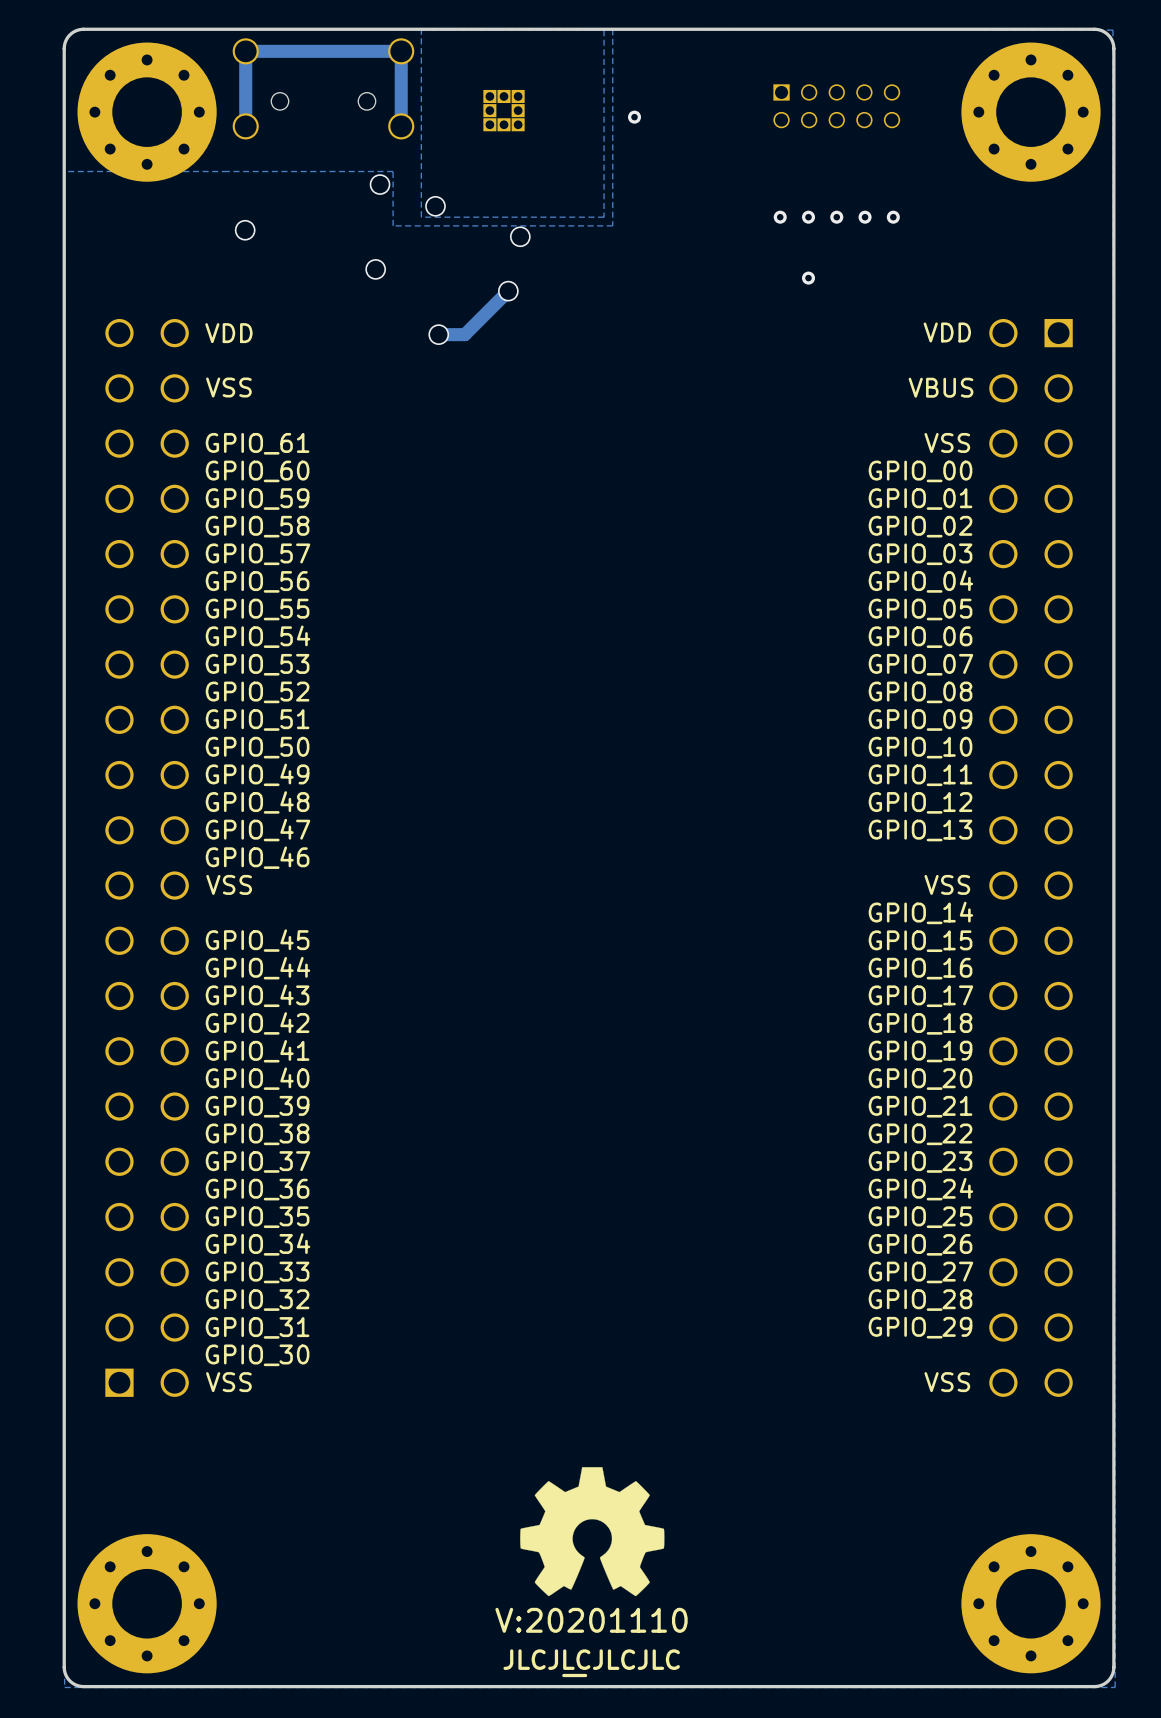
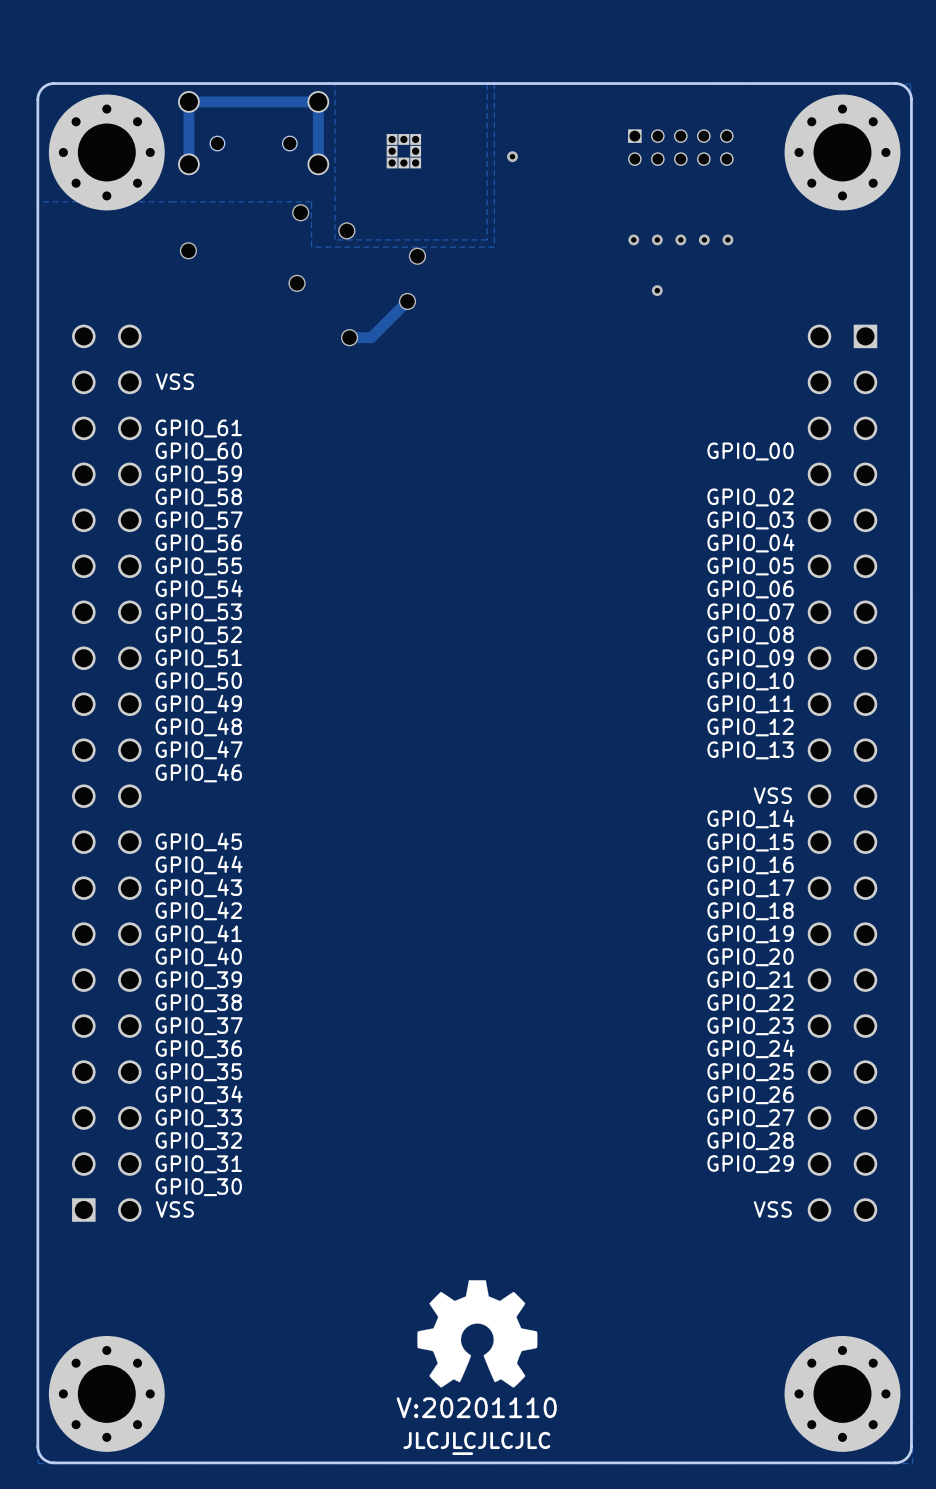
part text: VDD (947, 332) -> none
part text: VDD (228, 333) -> none
part text: VBUS (941, 387) -> none
part text: VSS (947, 442) -> none
part text: GPIO_01 (920, 499) -> none
part text: VSS (229, 884) -> none

